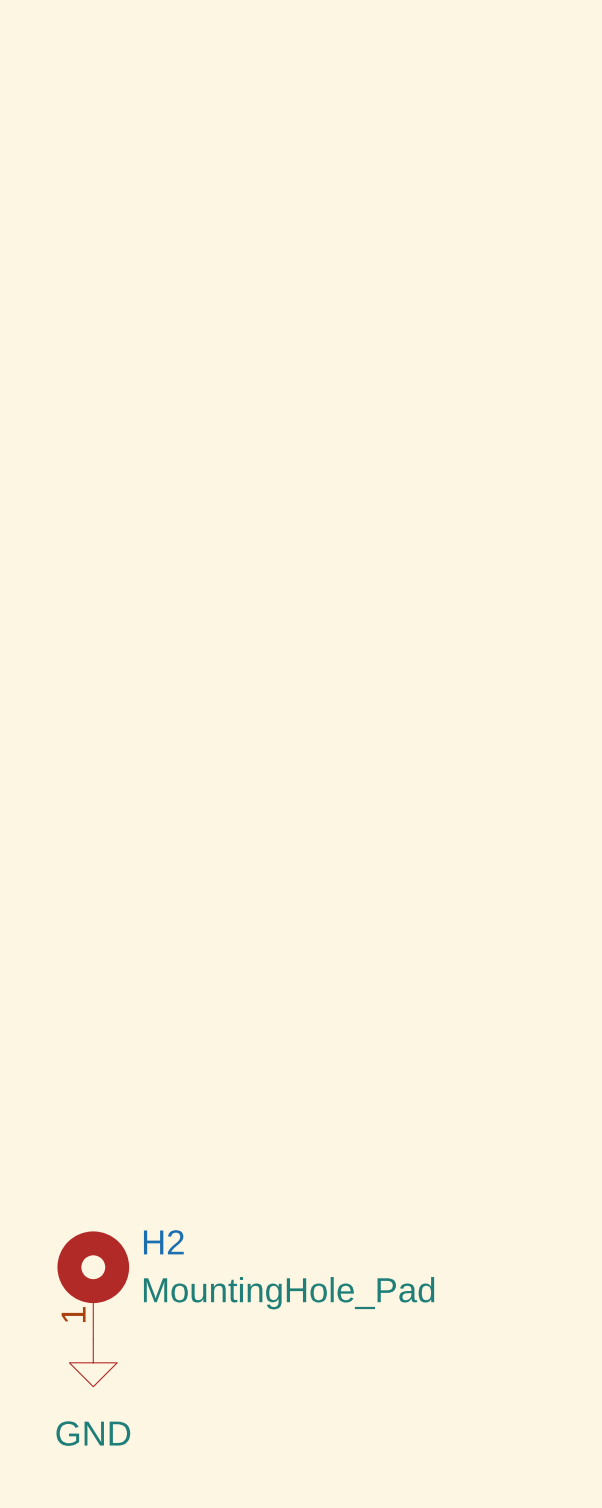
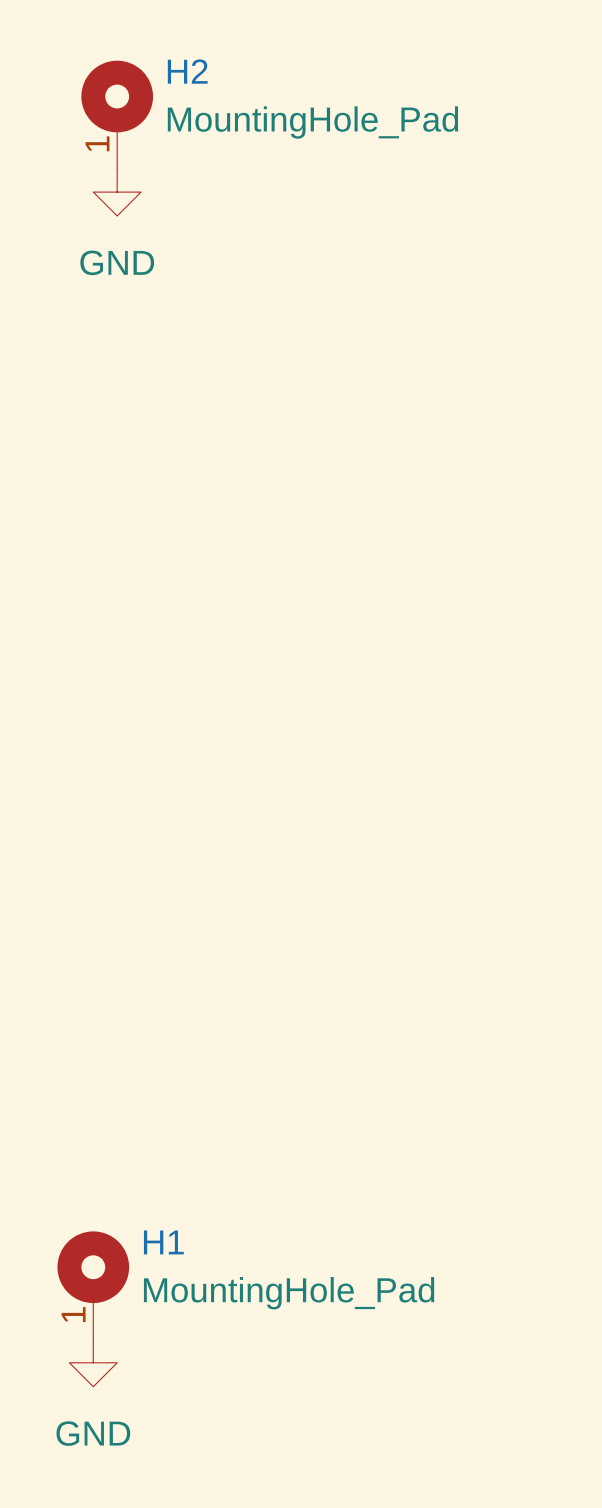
H2: none -> MountingHole_Pad (117, 114)
power symbol: none -> GND (117, 192)
H2 name: H2 (163, 1242) -> H1 (163, 1242)

